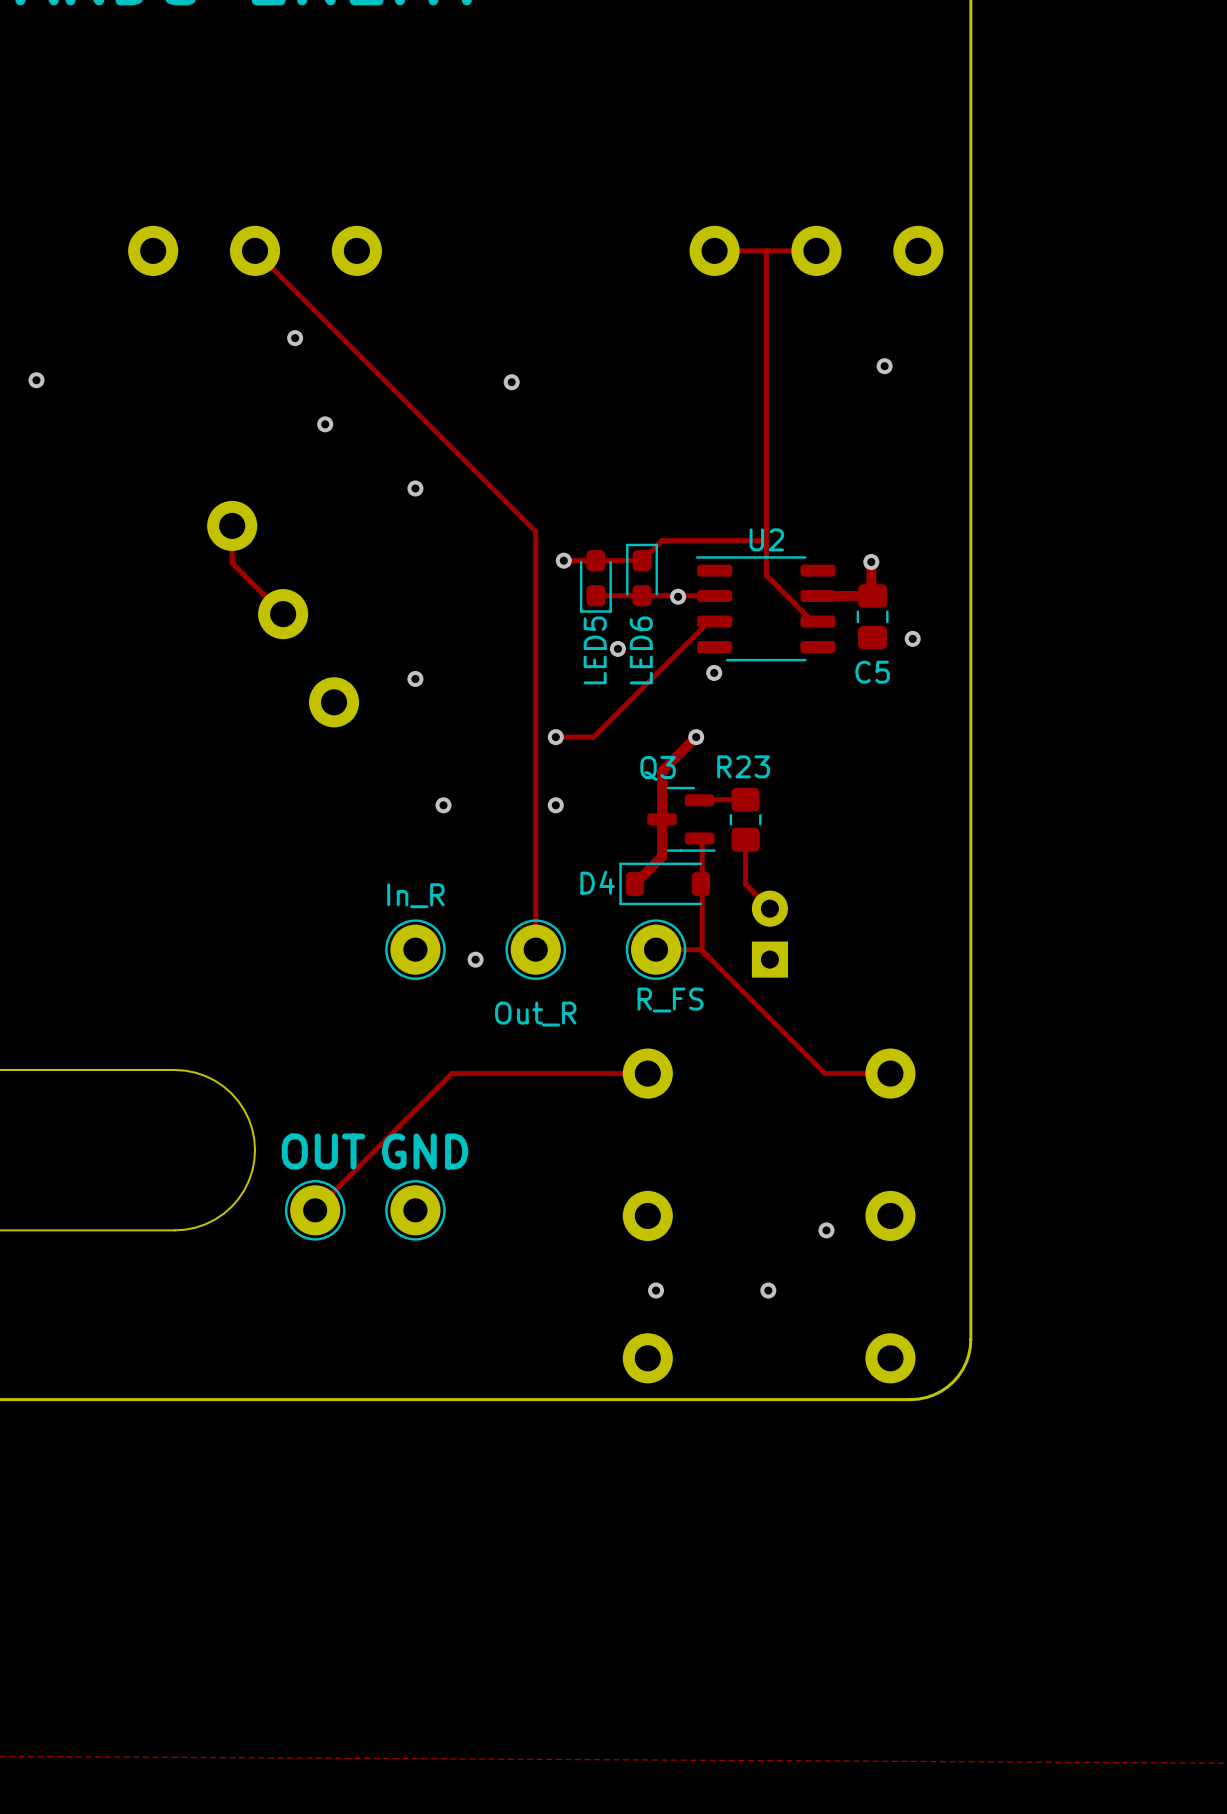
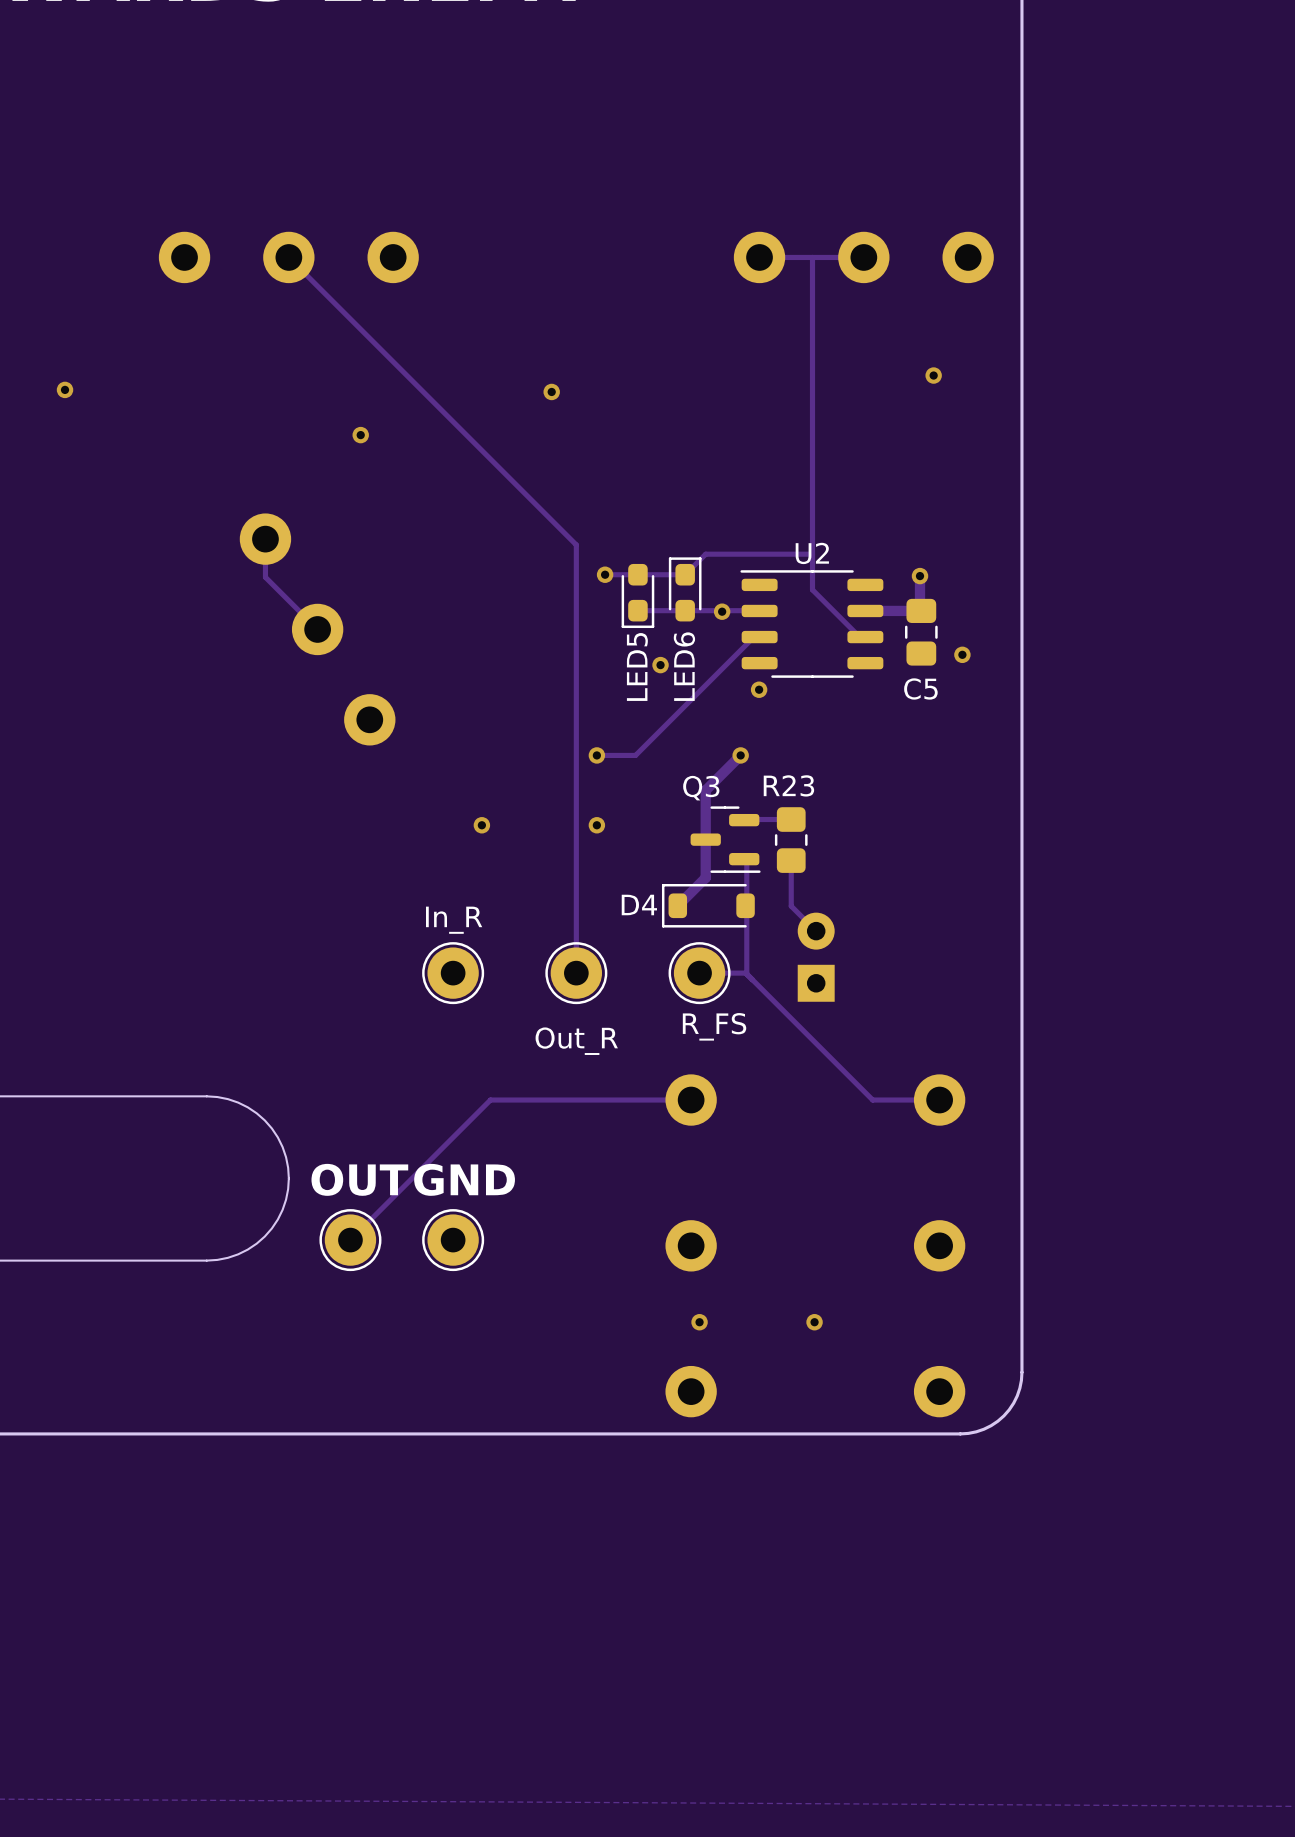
via: (295, 338) -> none
via: (415, 488) -> none
via: (415, 678) -> none
via: (475, 959) -> none
via: (826, 1230) -> none

